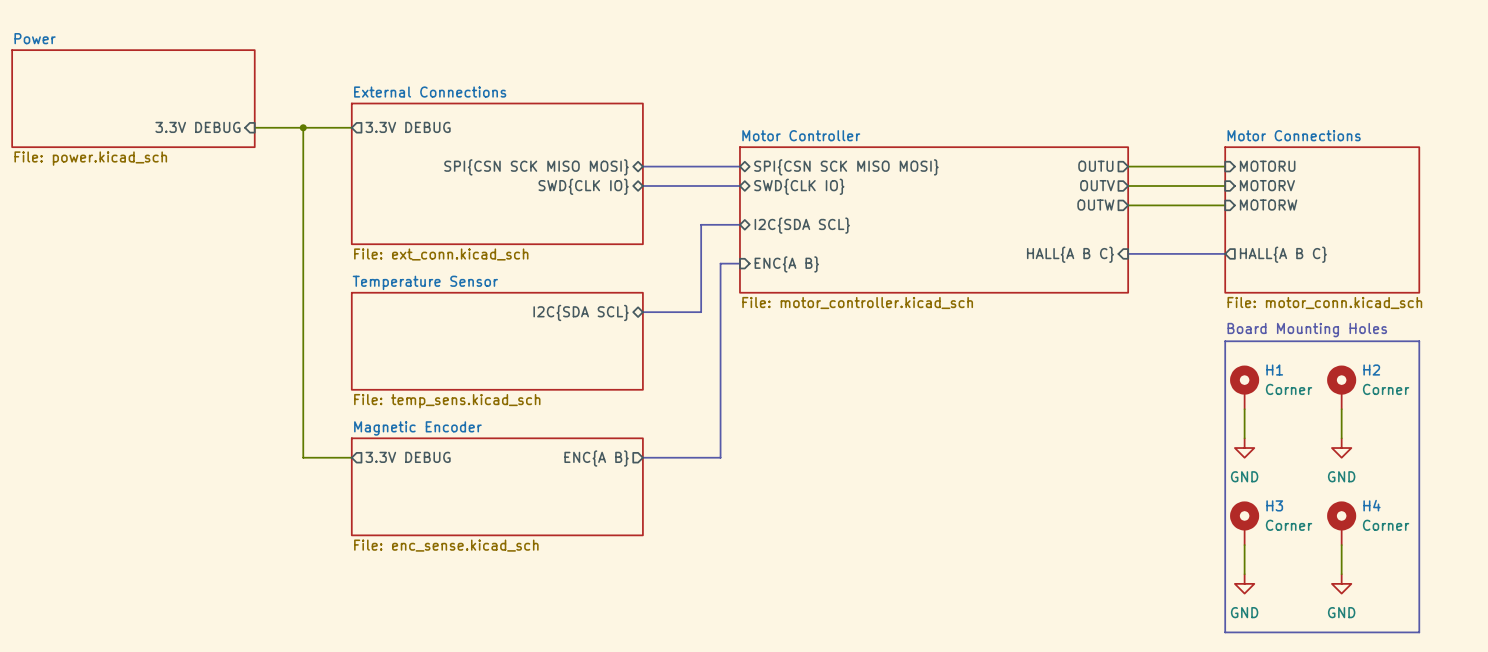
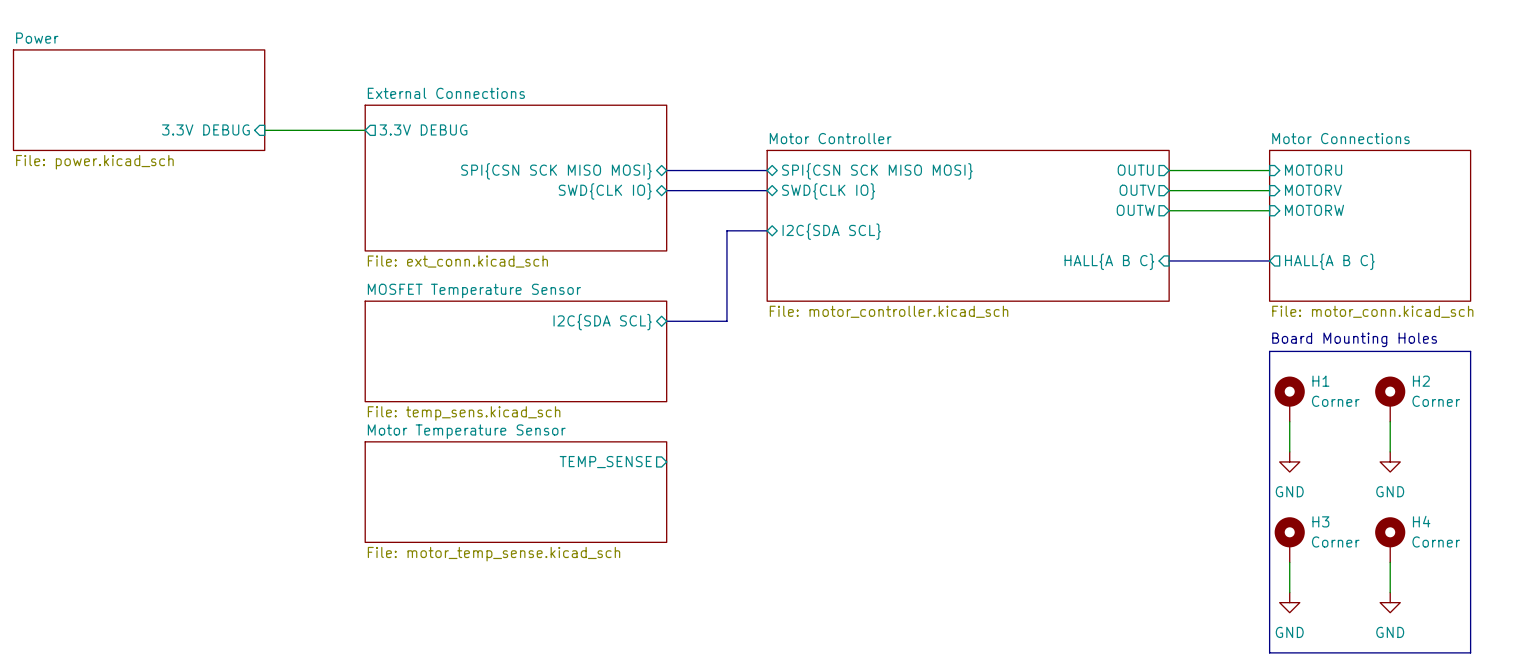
wire: (303, 127) (303, 457) (351, 457) -> none
junction: (303, 127) -> none
bus: (739, 263) (720, 263) (720, 457) (642, 457) -> none
sheet pin: ENC{A B} (786, 264) -> none
sheet Temperature Sensor name: Temperature Sensor (425, 282) -> MOSFET Temperature Sensor (474, 290)
sheet pin: none -> TEMP_SENSE (605, 462)
sheet pin: 3.3V DEBUG (408, 457) -> none
sheet pin: ENC{A B} (596, 458) -> none
sheet Motor Temperature Sensor: none -> File: motor_temp_sense.kicad_sch (515, 492)
sheet Magnetic Encoder: File: enc_sense.kicad_sch (497, 486) -> none

